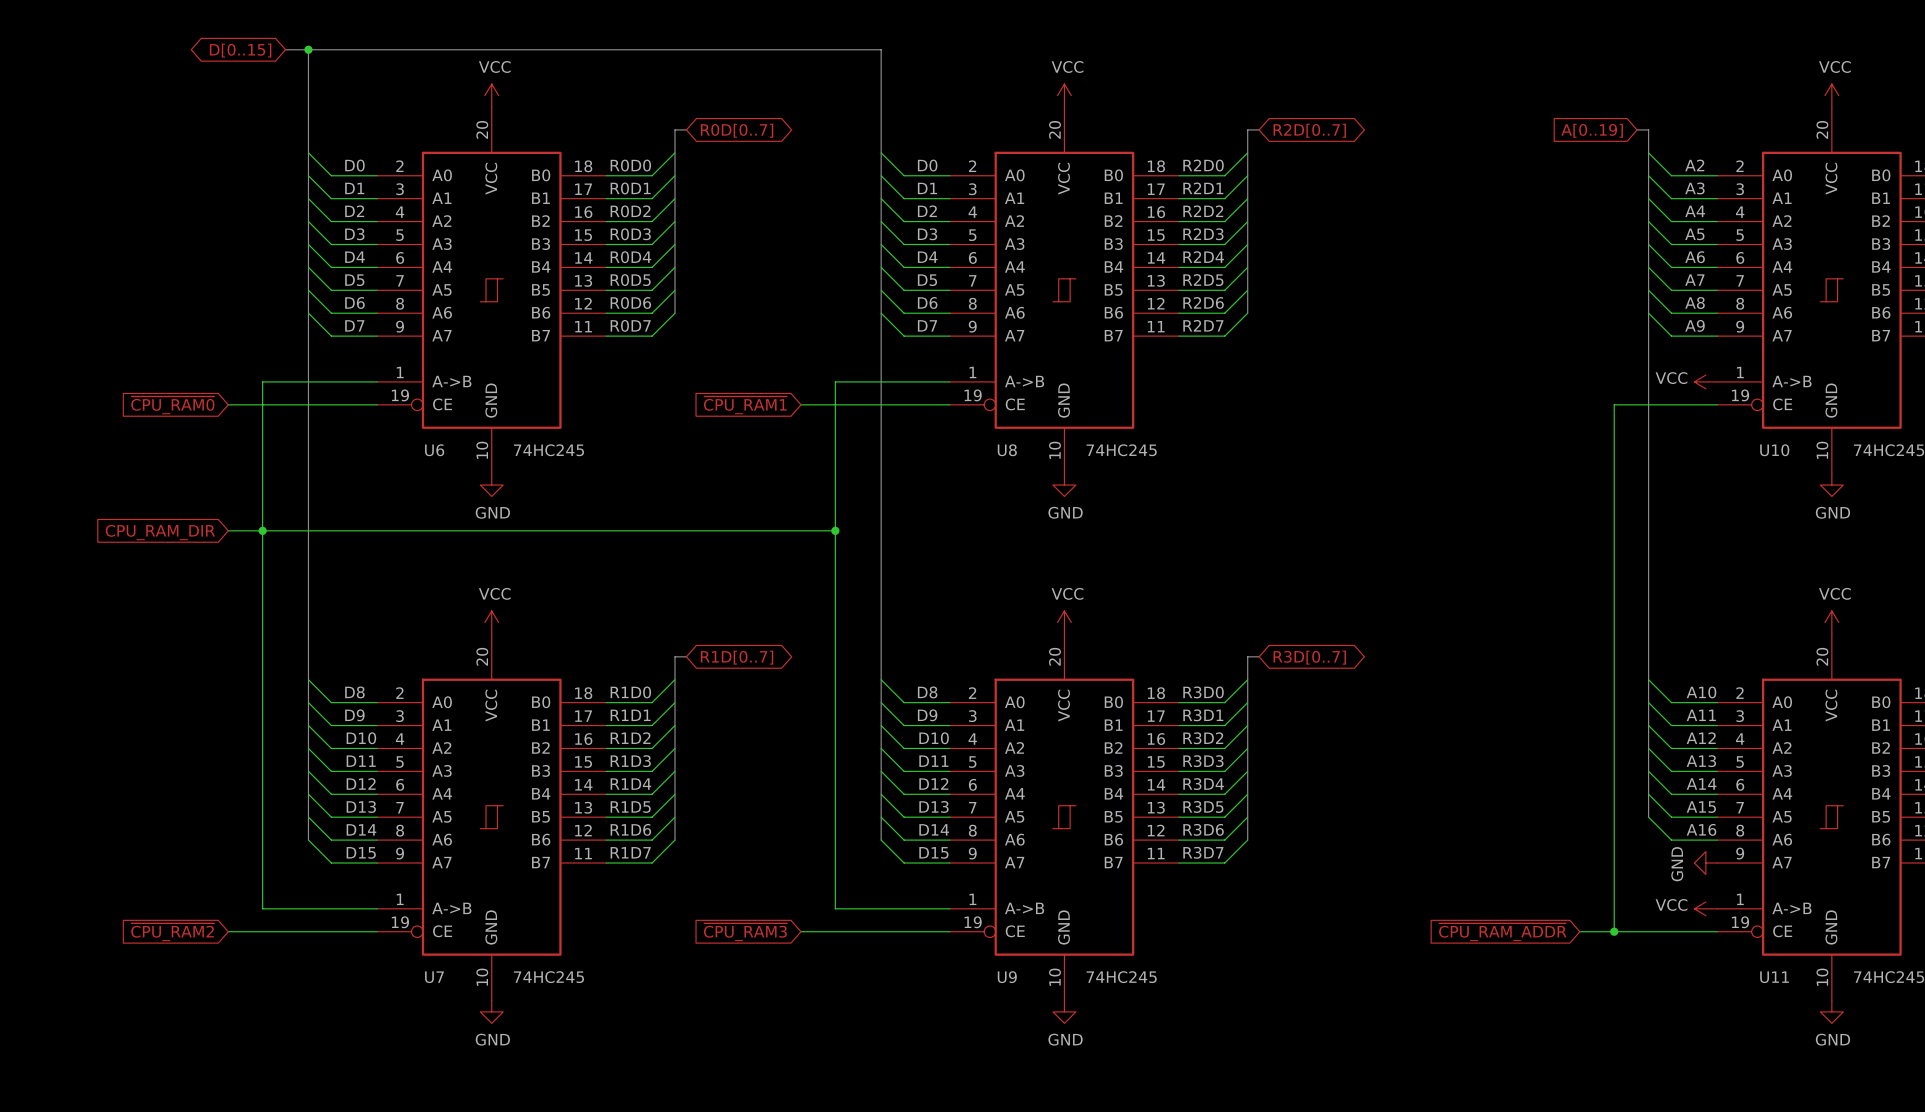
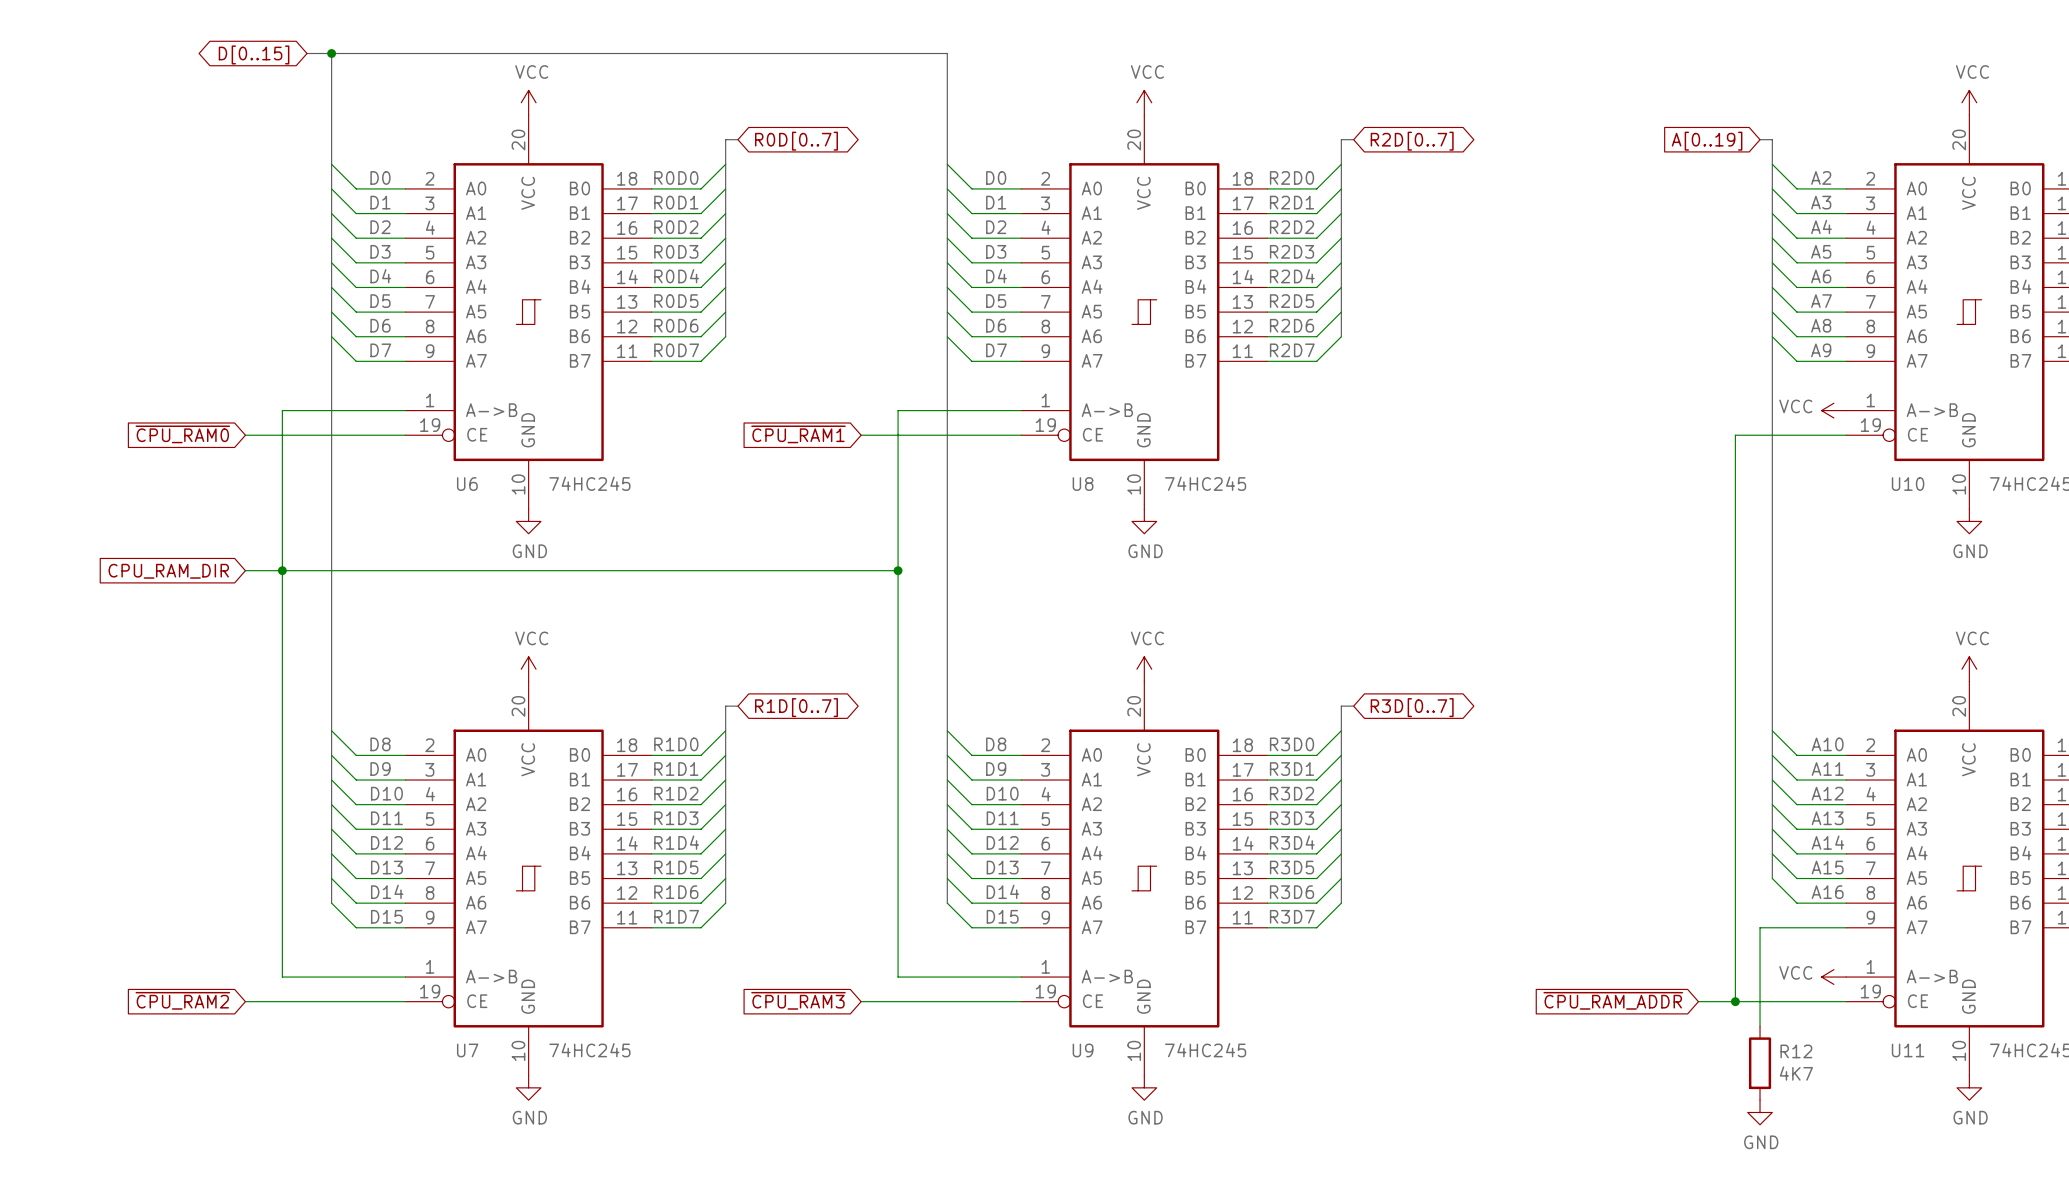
power symbol rotation: 0° (1705, 863) -> 90° counterclockwise (1760, 1112)
power symbol position: GND (1705, 863) -> GND (1760, 1112)
wire: none -> (1846, 927) (1760, 927) (1760, 1026)
R12: none -> 4K7 (1760, 1063)

